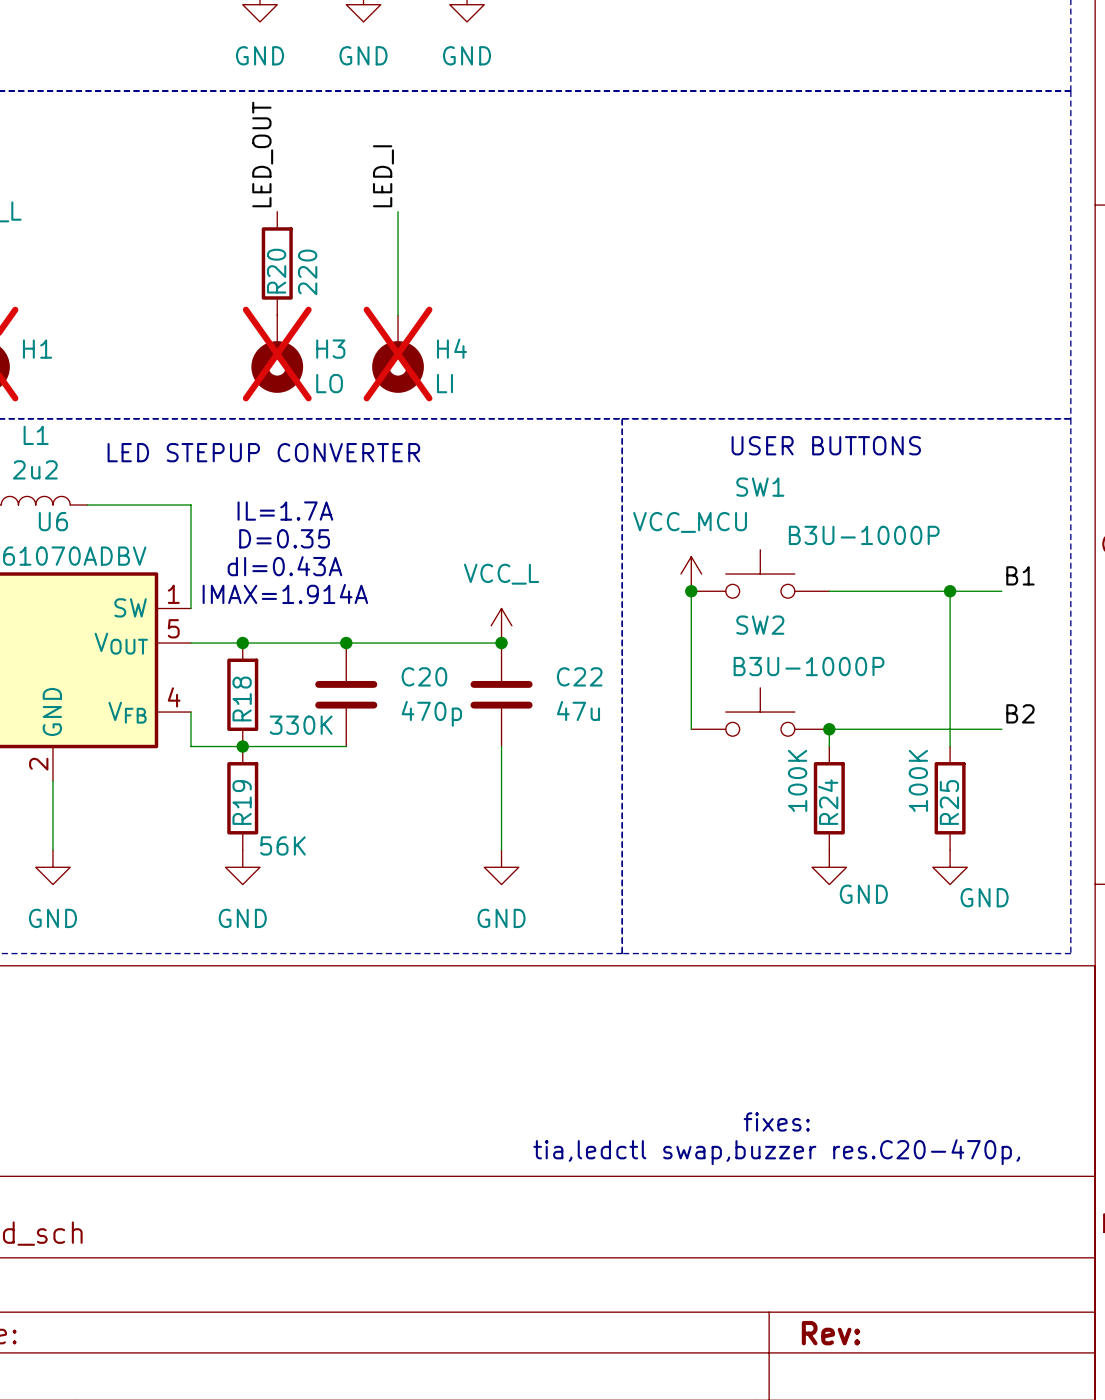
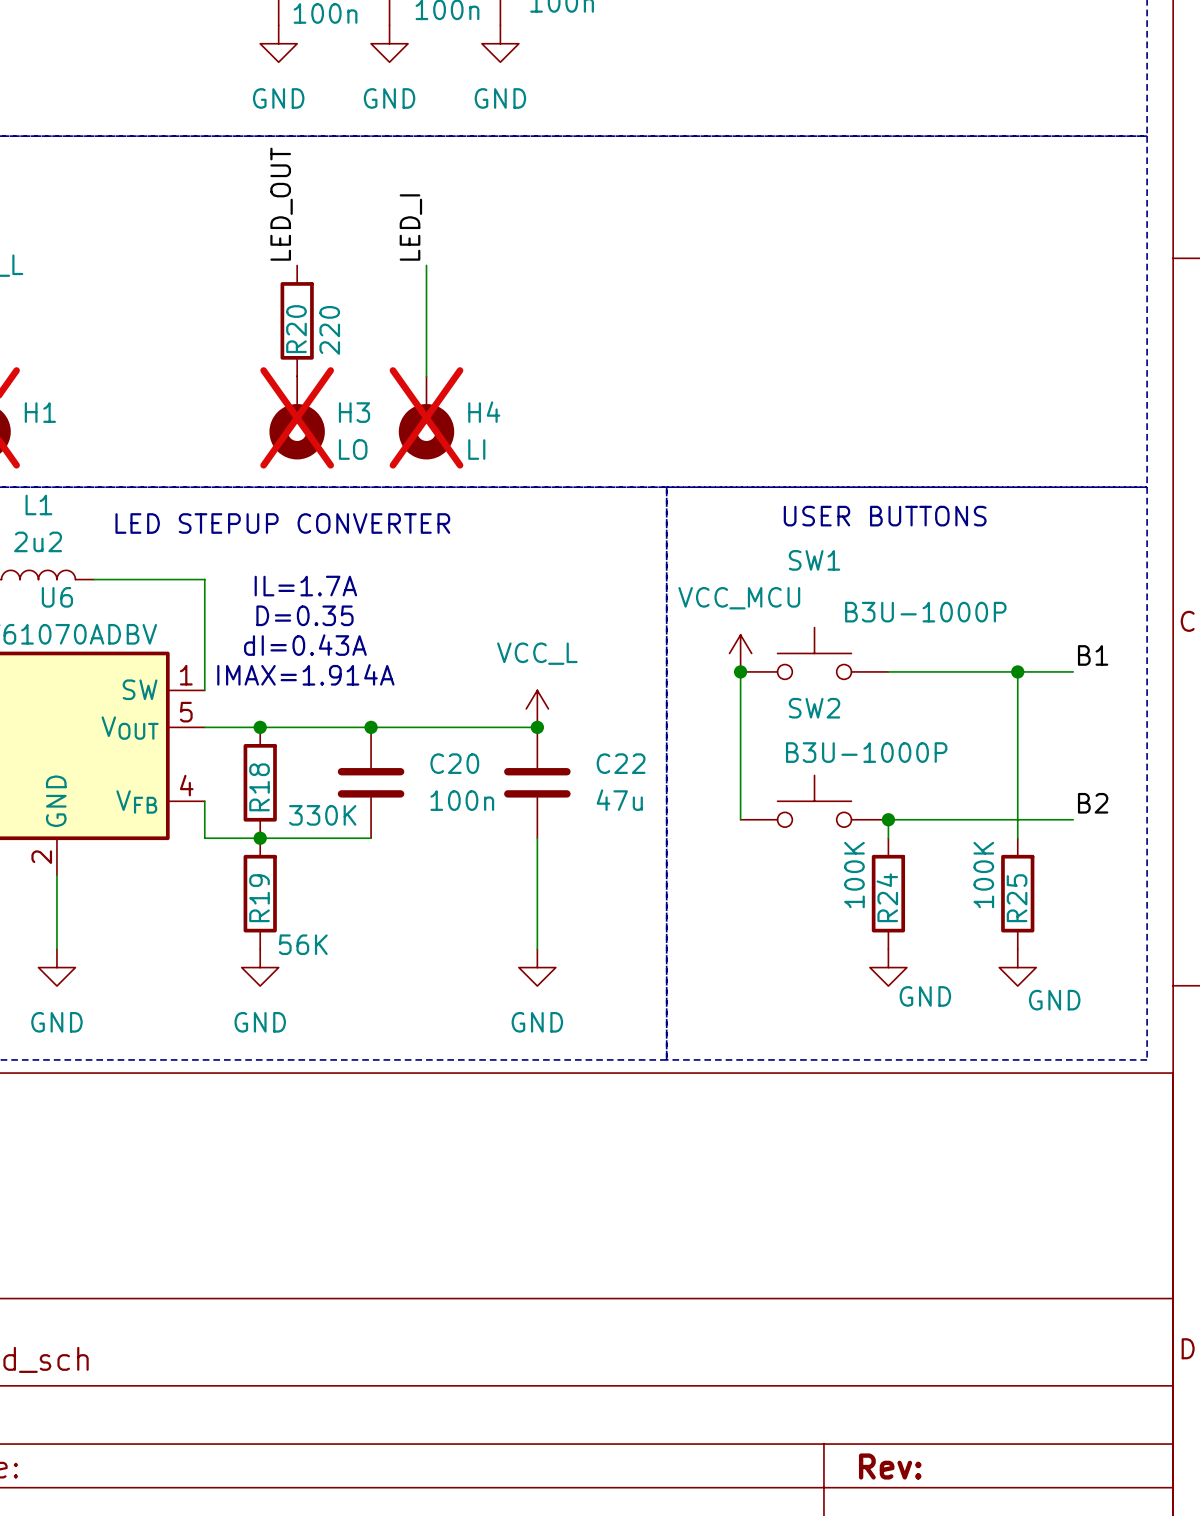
C20 value: 470p (431, 713) -> 100n (462, 800)
text: fixes: (776, 1121) -> none
text: tia,ledctl swap,buzzer res.C20-470p, (776, 1152) -> none

